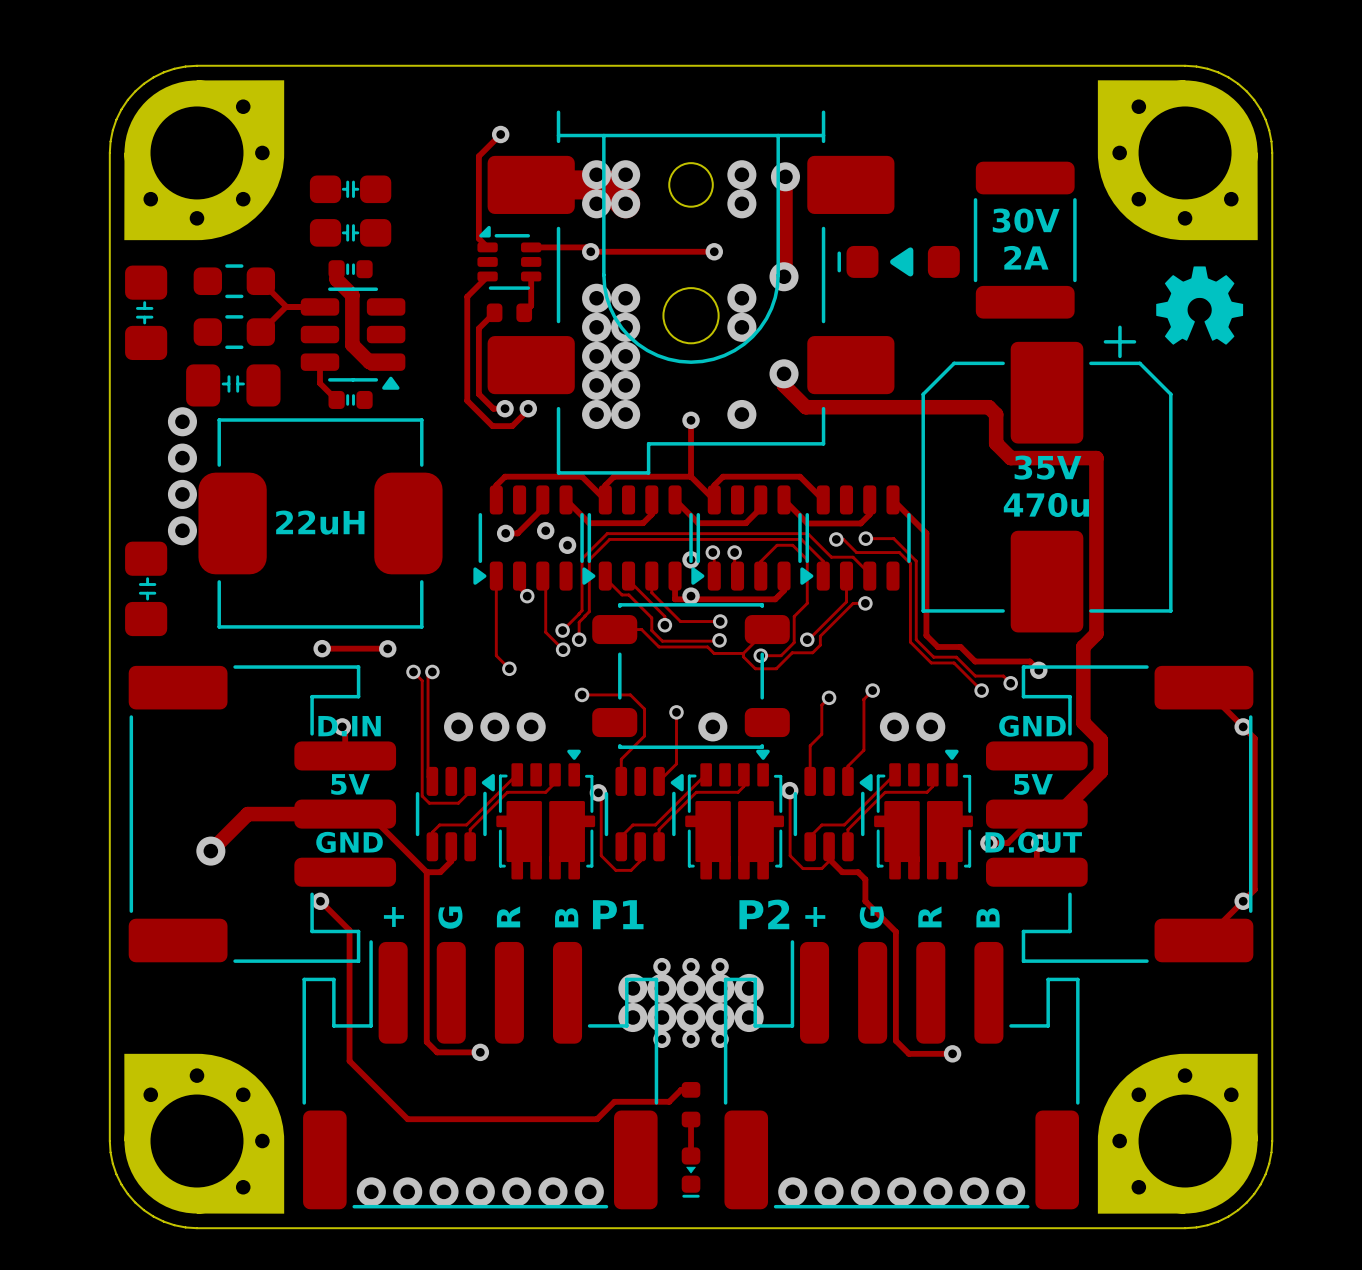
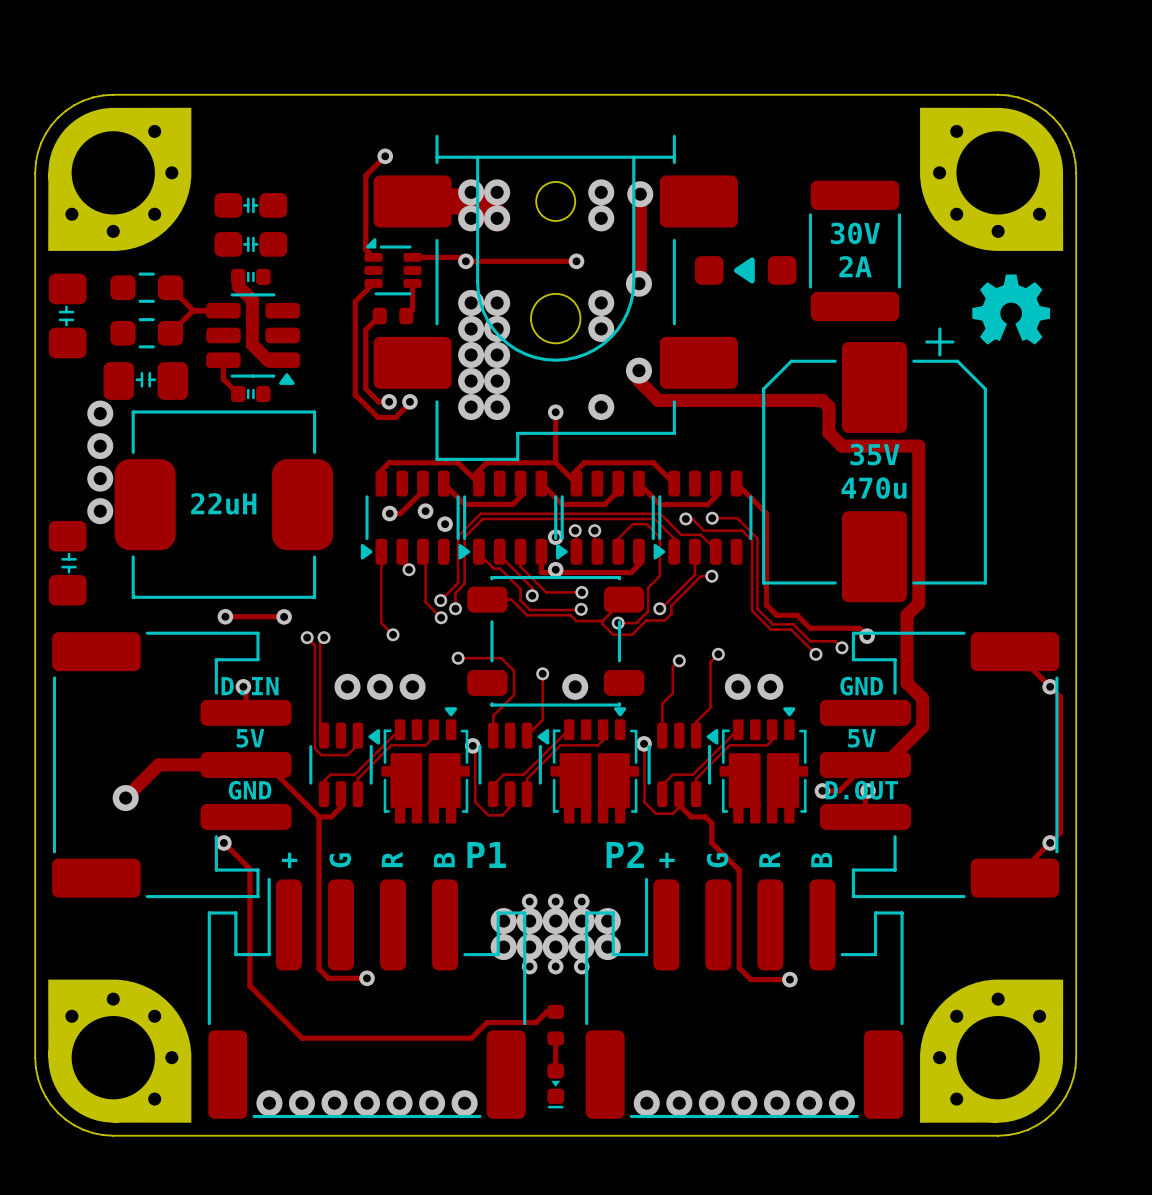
part footprint: [837, 245, 960, 278] -> [694, 256, 797, 285]

